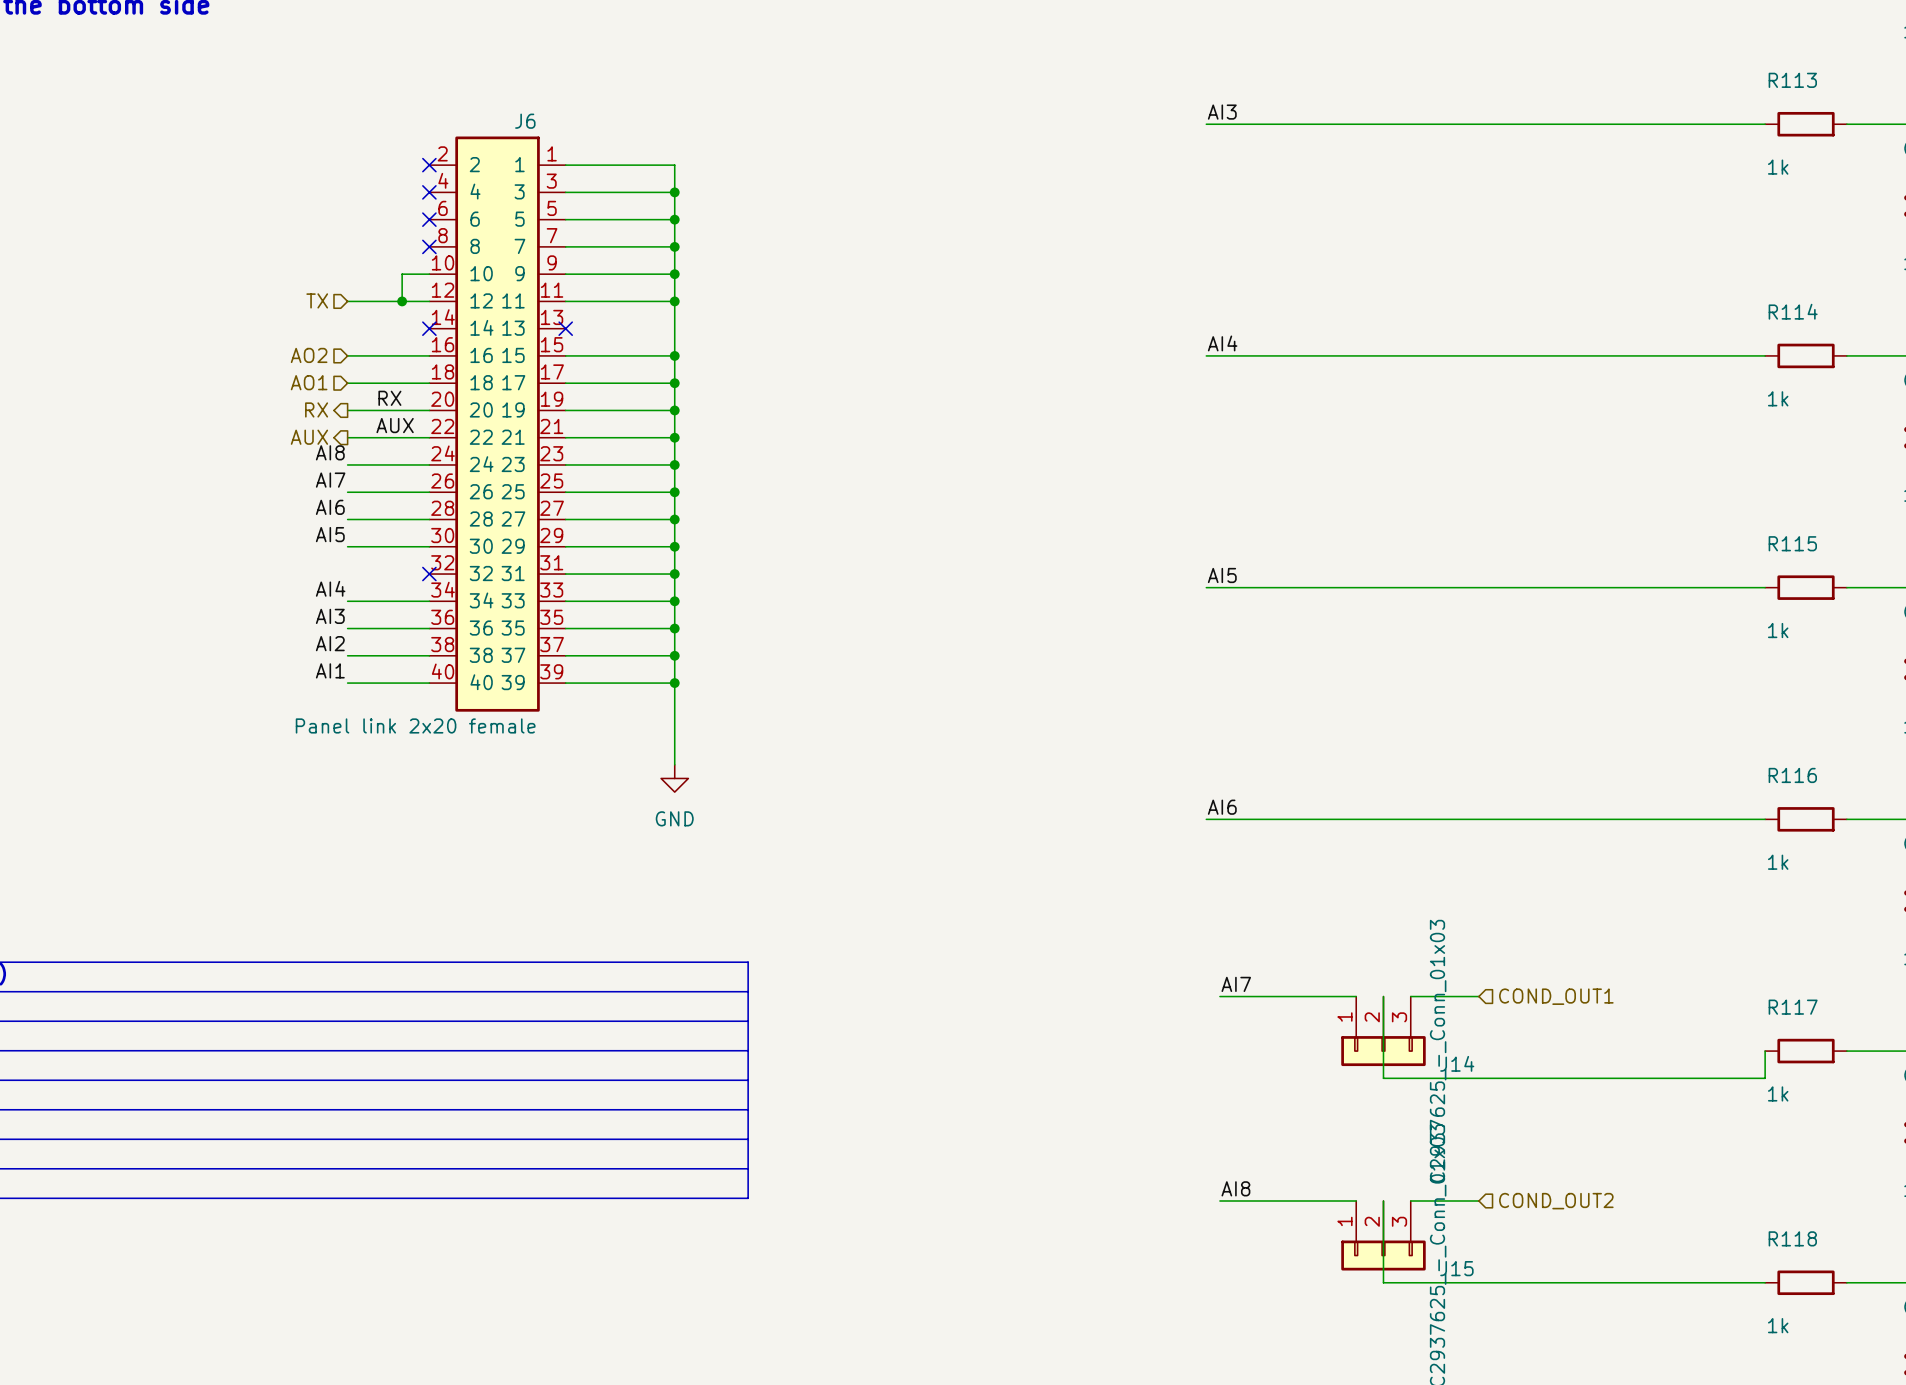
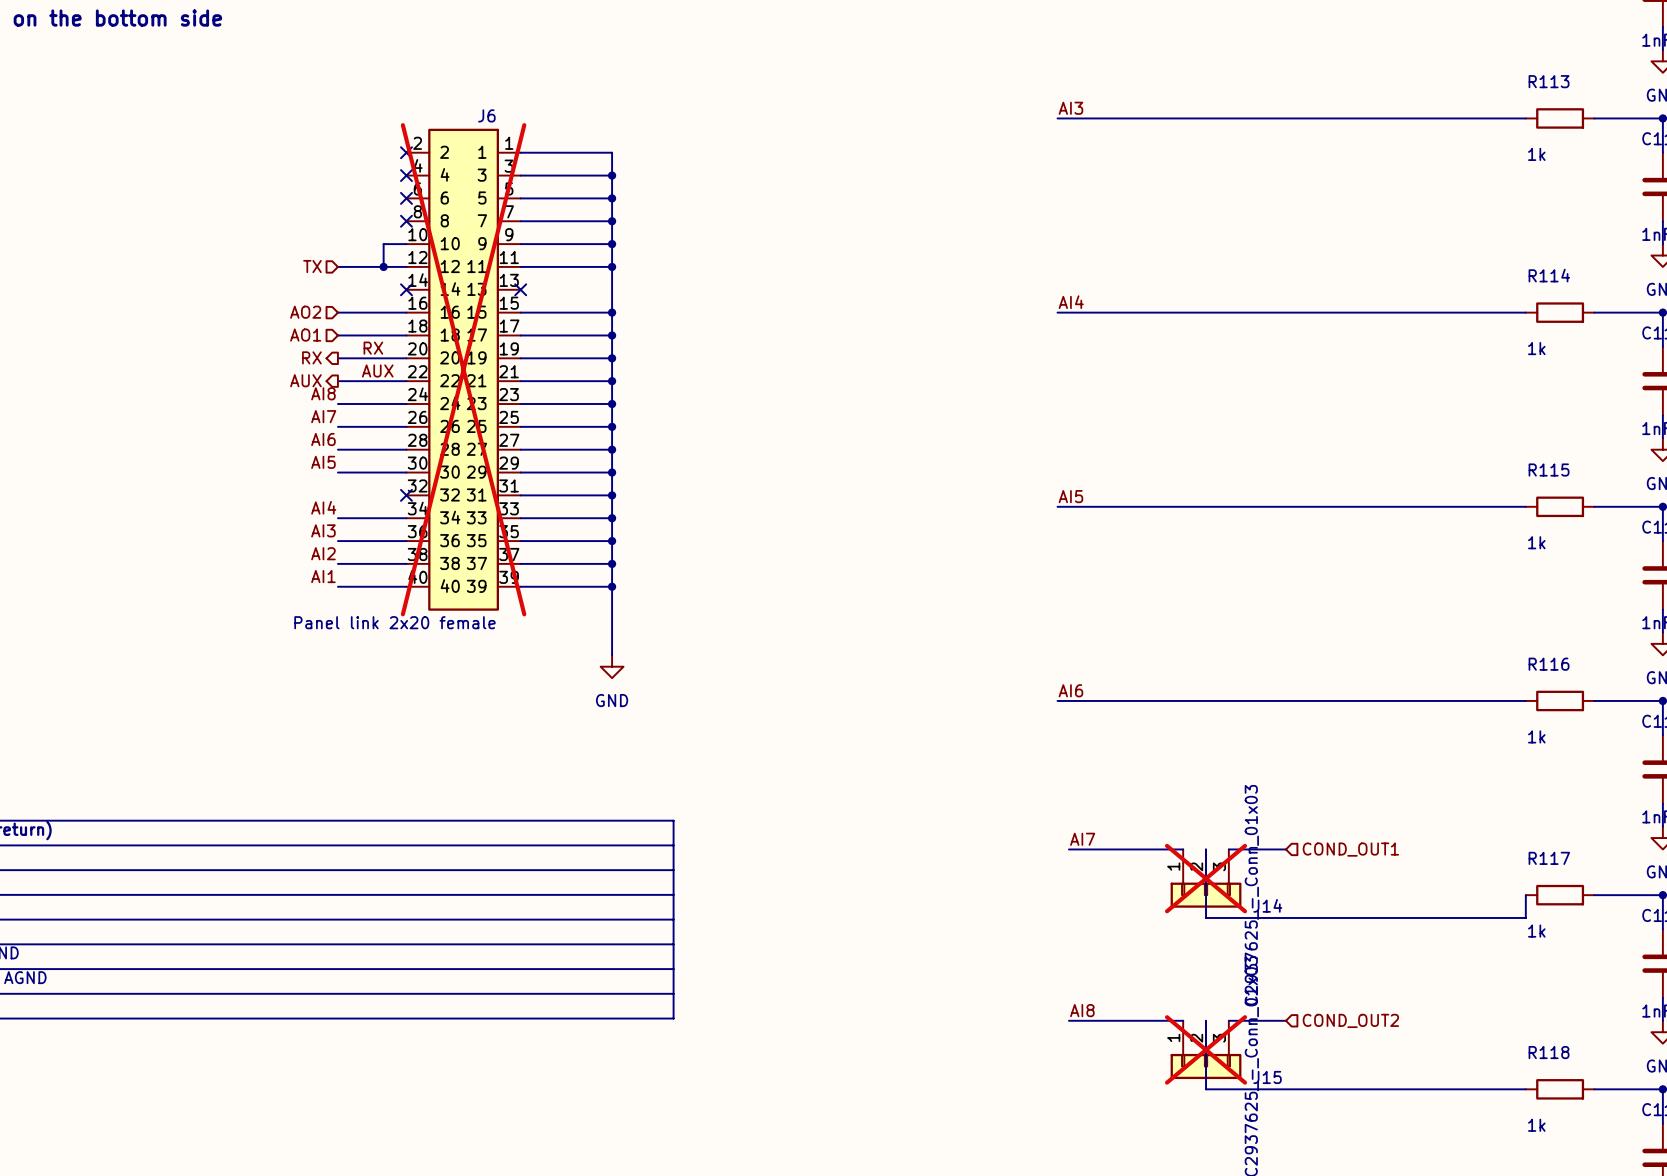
J6 do-not-place cross: none -> (463, 369)
J14 do-not-place cross: none -> (1206, 878)
J15 do-not-place cross: none -> (1206, 1049)

